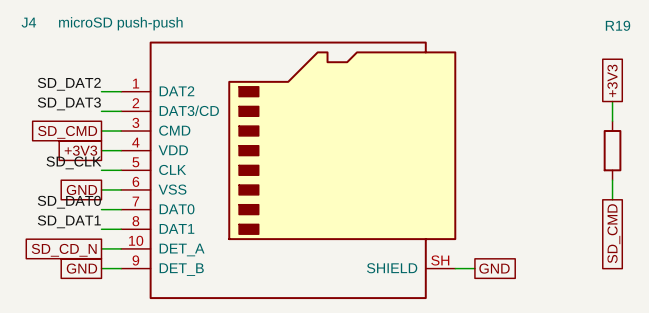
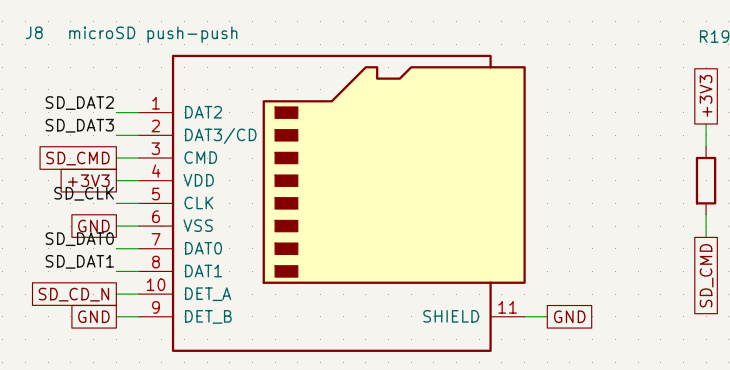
J4 name: J4 (28, 22) -> J8 (34, 32)
J4 pin number: SH (440, 260) -> 11 (507, 307)

